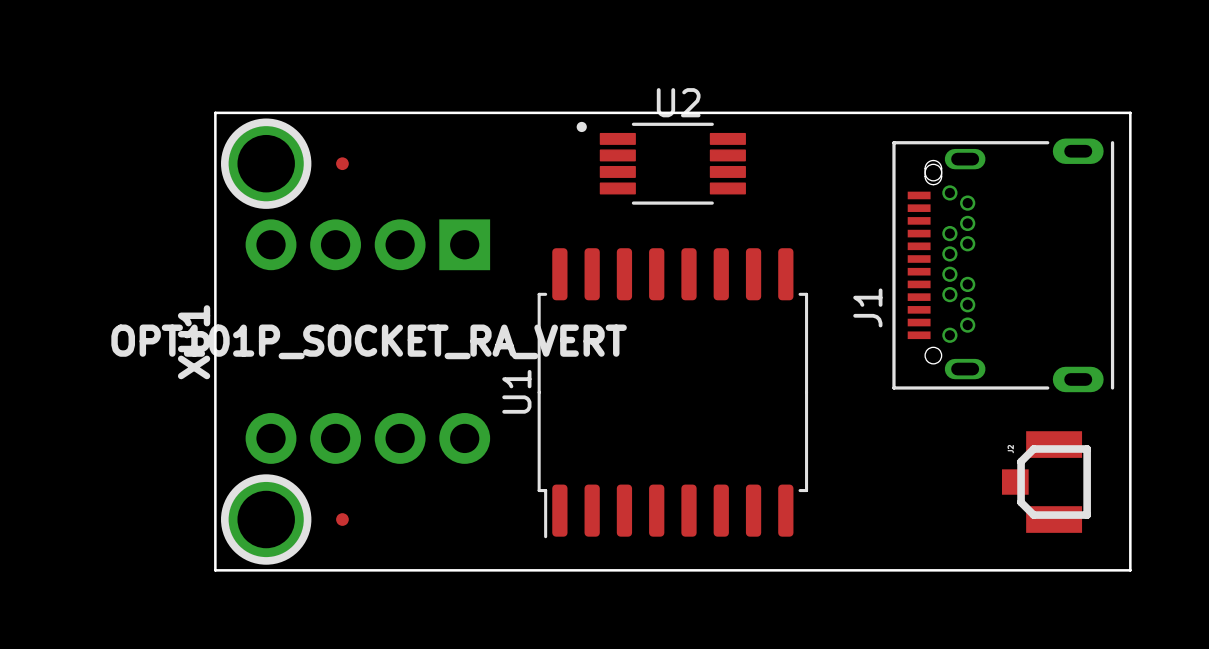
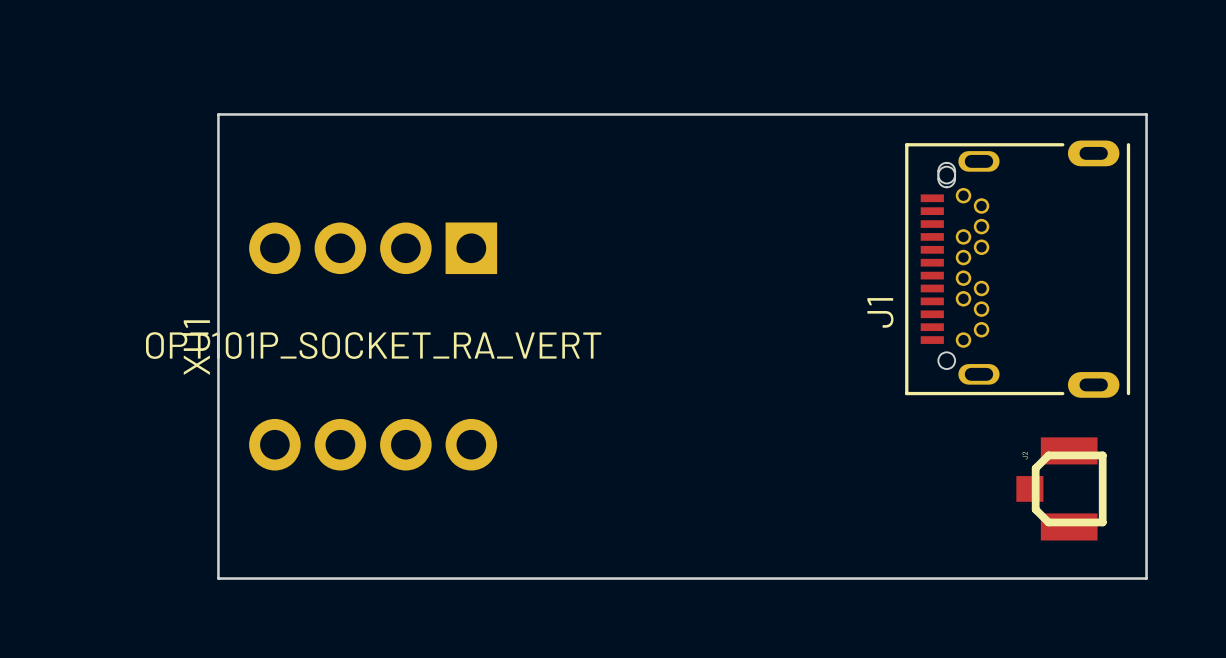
part: (266, 163) -> none
part: (342, 163) -> none
U2: (661, 163) -> none
U1: (672, 393) -> none
part: (266, 519) -> none
part: (342, 519) -> none

